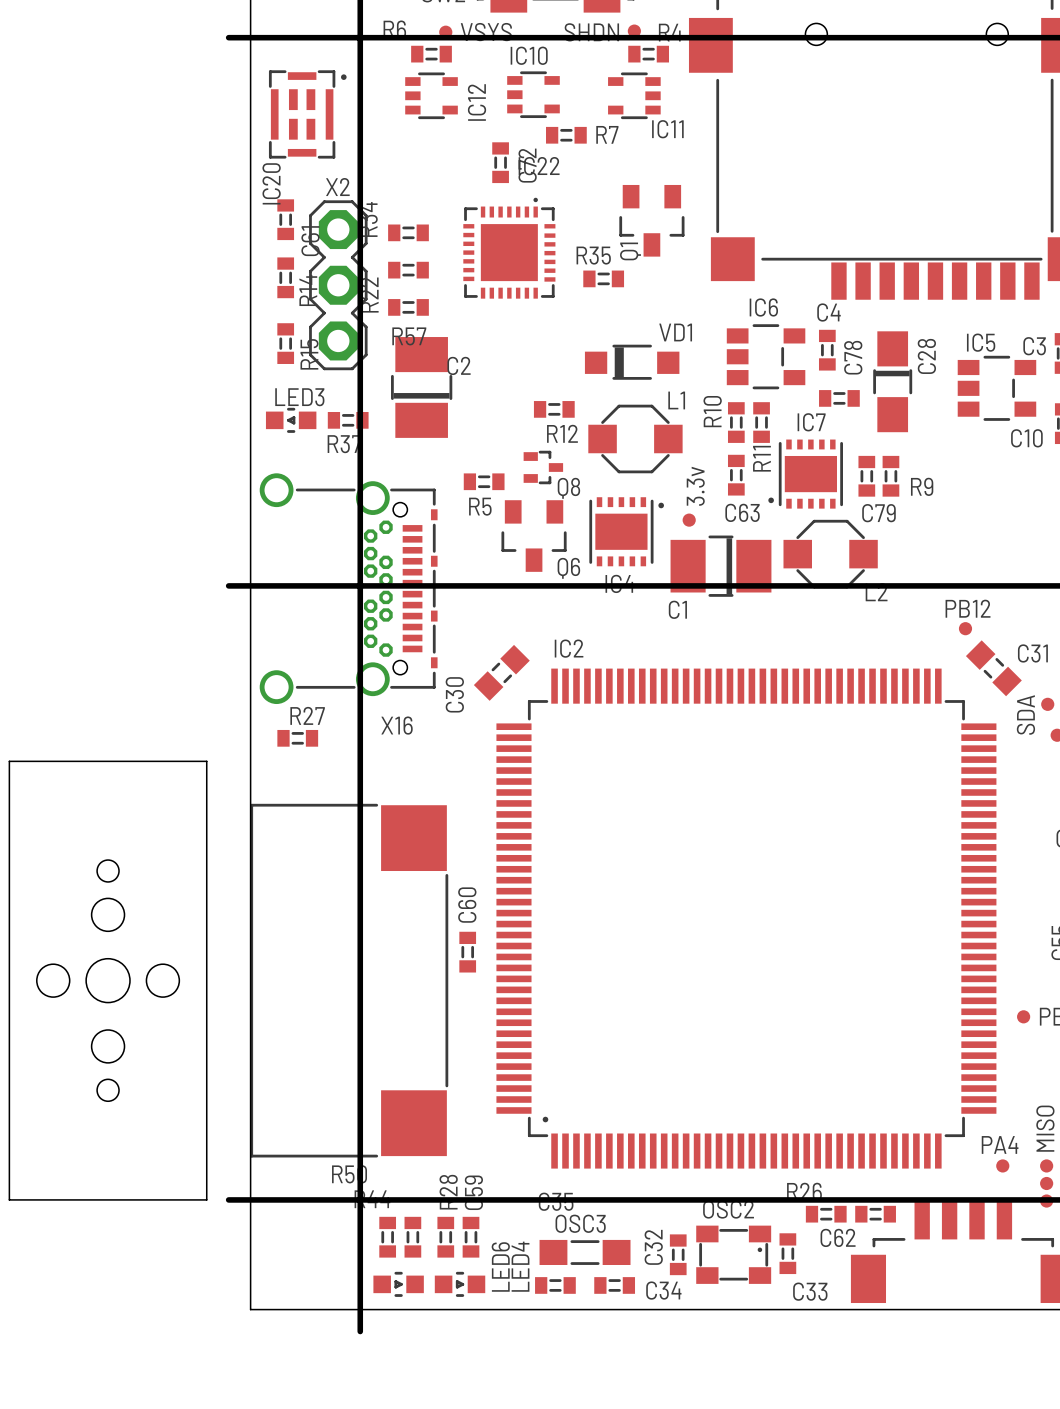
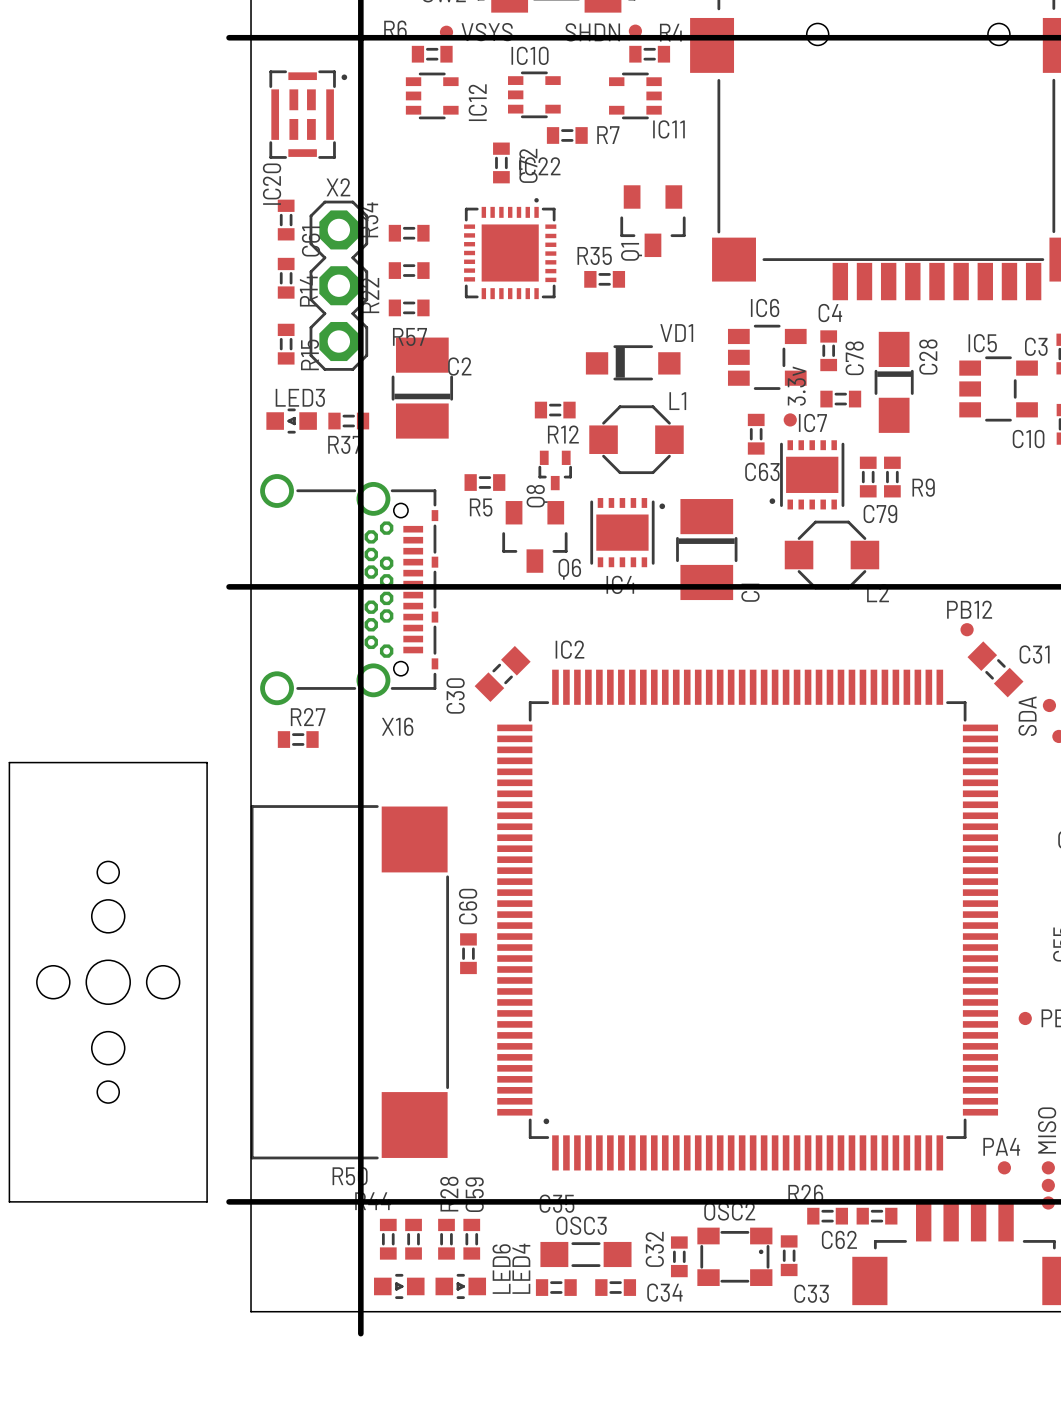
R10: (736, 422) -> none
R11: (761, 422) -> none
Q8 rotation: 0° (543, 467) -> 90° clockwise (555, 470)
C63 position: (736, 475) -> (756, 434)
part position: (689, 520) -> (790, 419)
C1 rotation: 0° (720, 566) -> 90° counterclockwise (706, 549)

